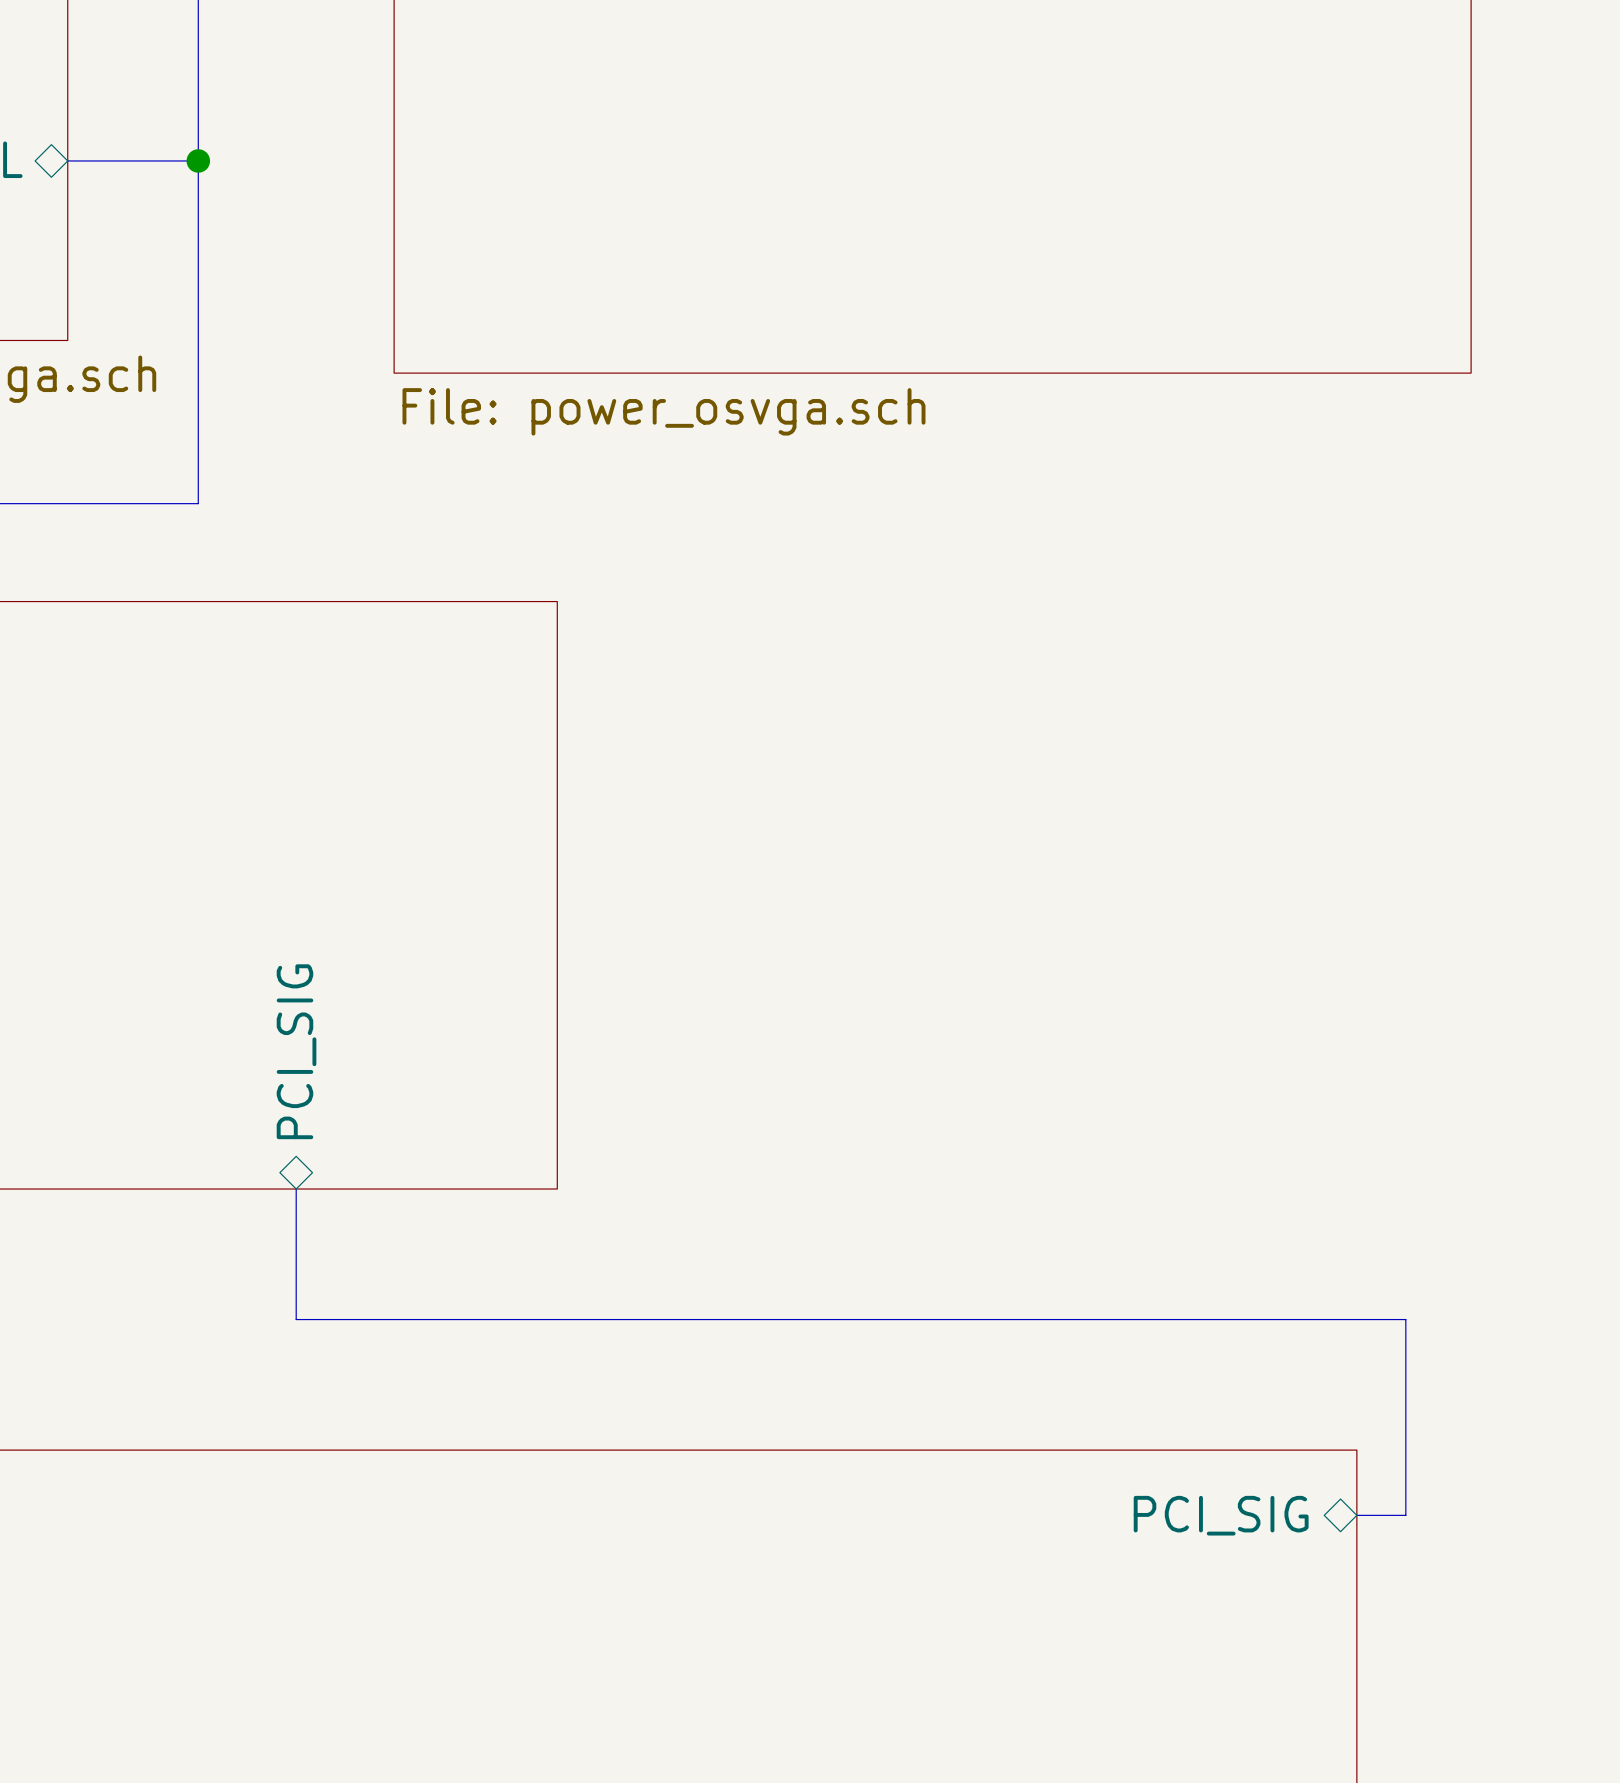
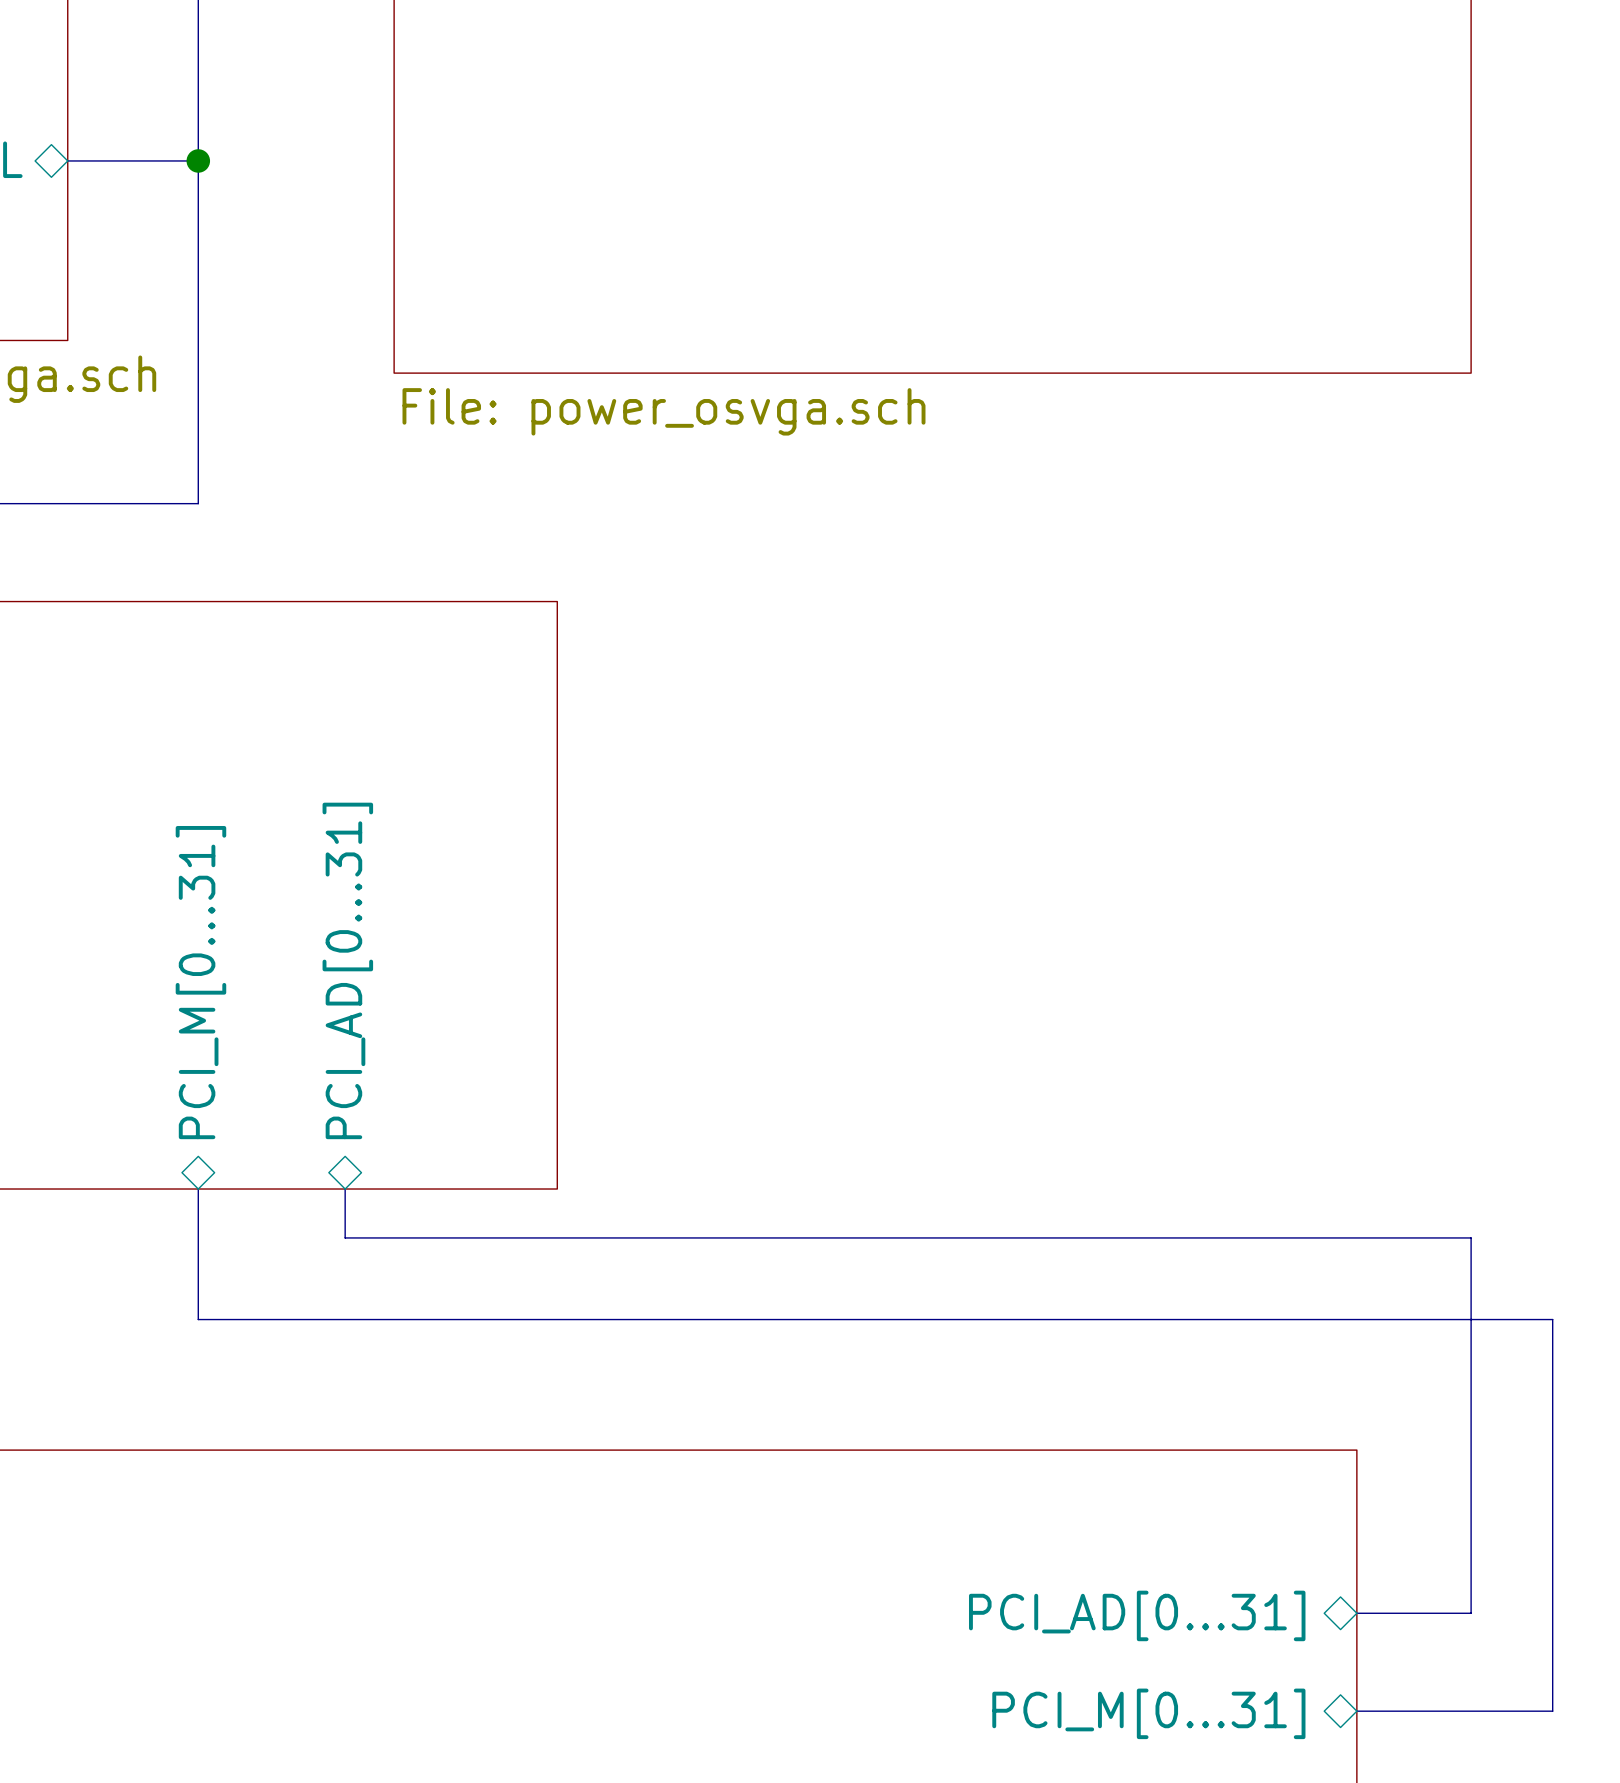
sheet pin: none -> PCI_AD[0...31] (347, 970)
sheet pin: none -> PCI_M[0...31] (200, 982)
sheet pin: PCI_SIG (296, 1051) -> none
bus: (296, 1189) (296, 1319) -> (198, 1189) (198, 1319) (296, 1319)
bus: none -> (345, 1189) (345, 1237) (1471, 1237) (1471, 1613) (1356, 1613)
bus: (1405, 1319) (1405, 1515) (1356, 1515) -> (1405, 1319) (1552, 1319) (1552, 1711) (1356, 1711)
sheet pin: PCI_SIG (1221, 1515) -> none
sheet pin: none -> PCI_AD[0...31] (1137, 1615)
sheet pin: none -> PCI_M[0...31] (1148, 1713)

